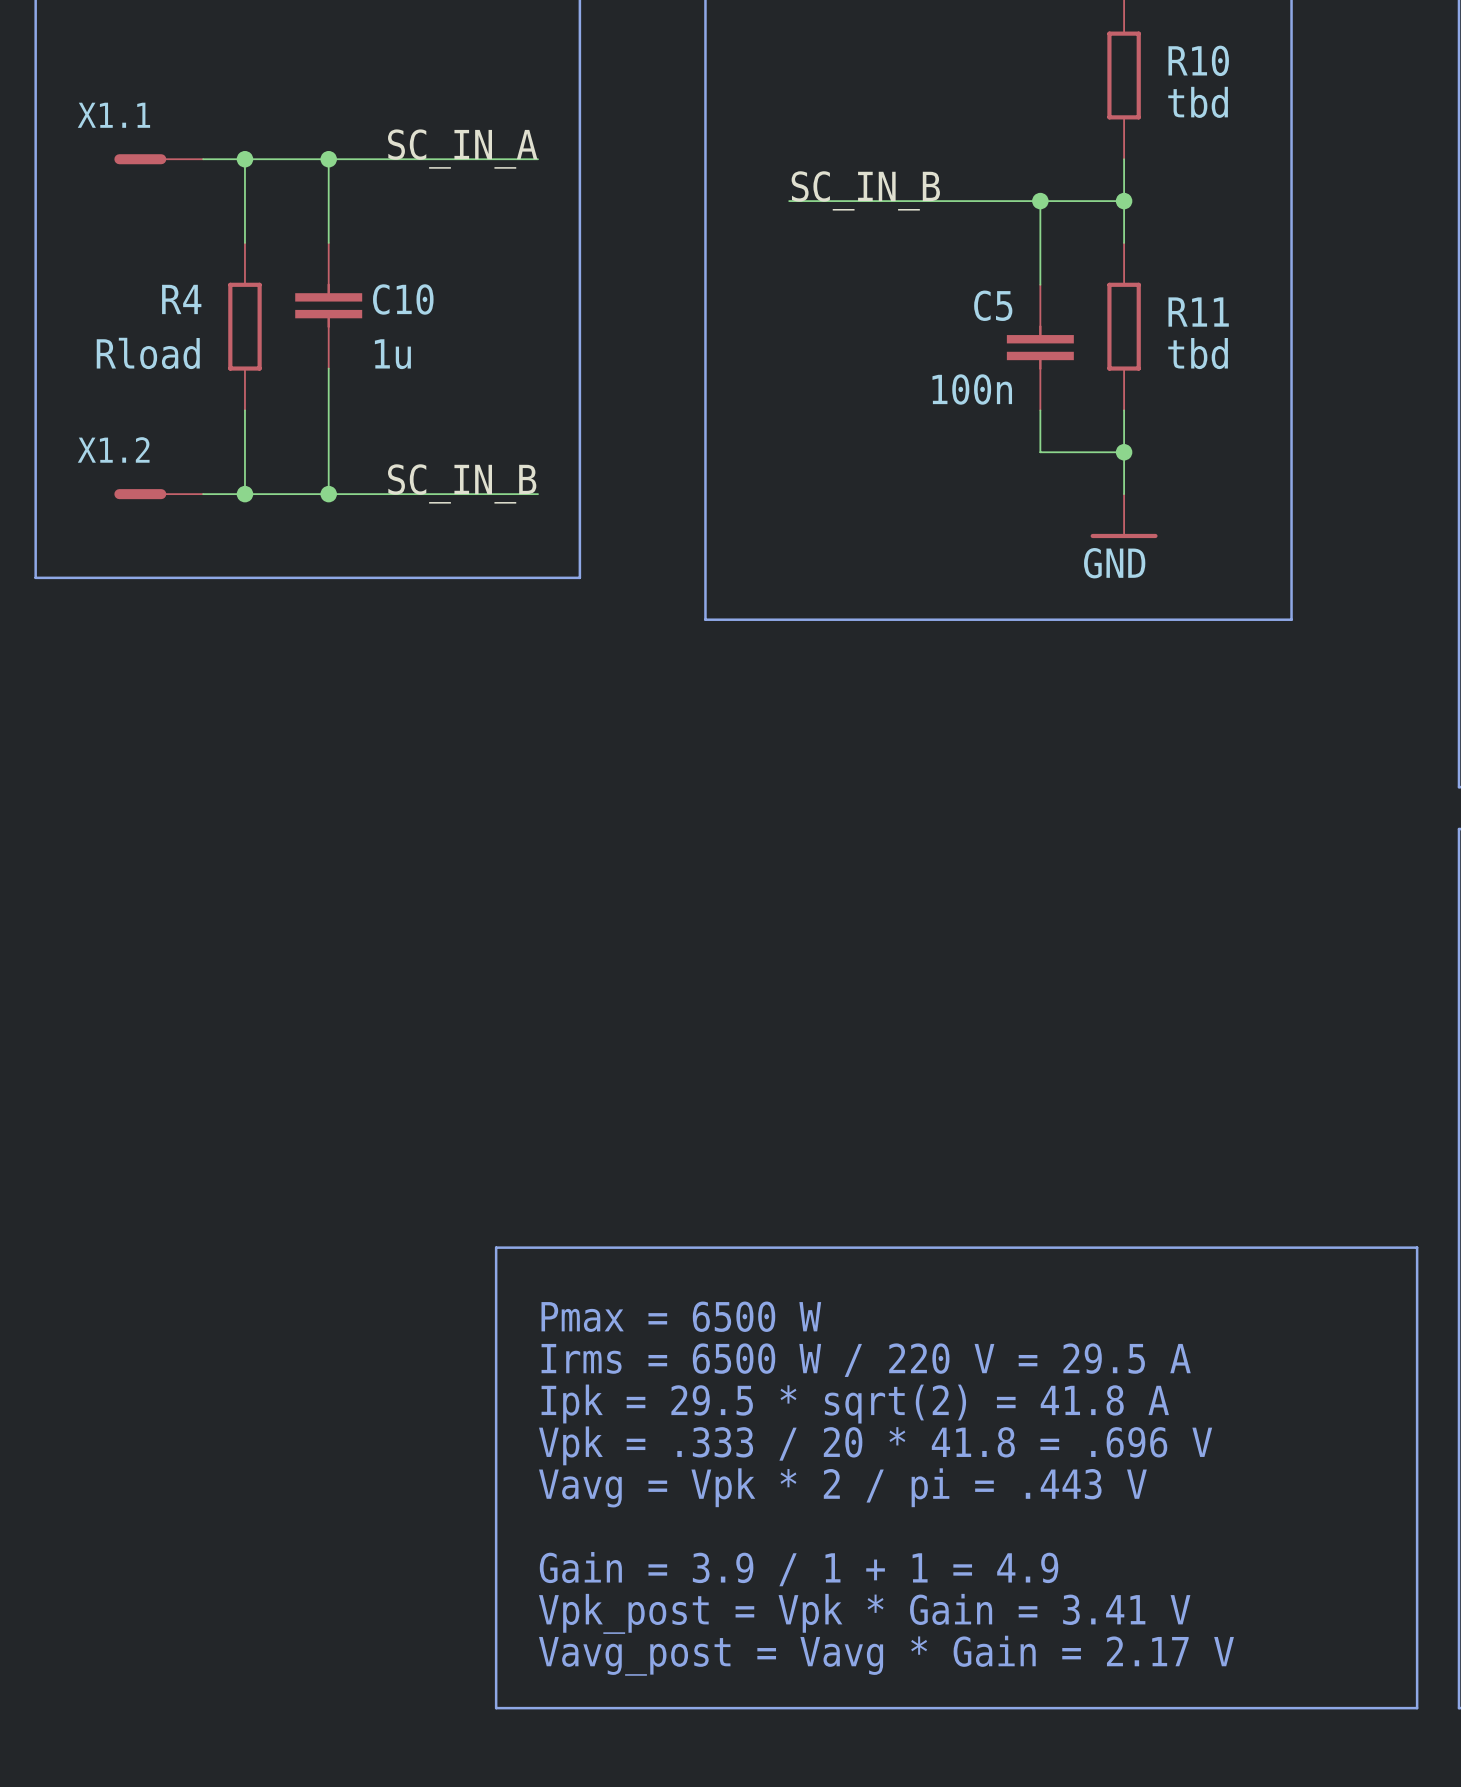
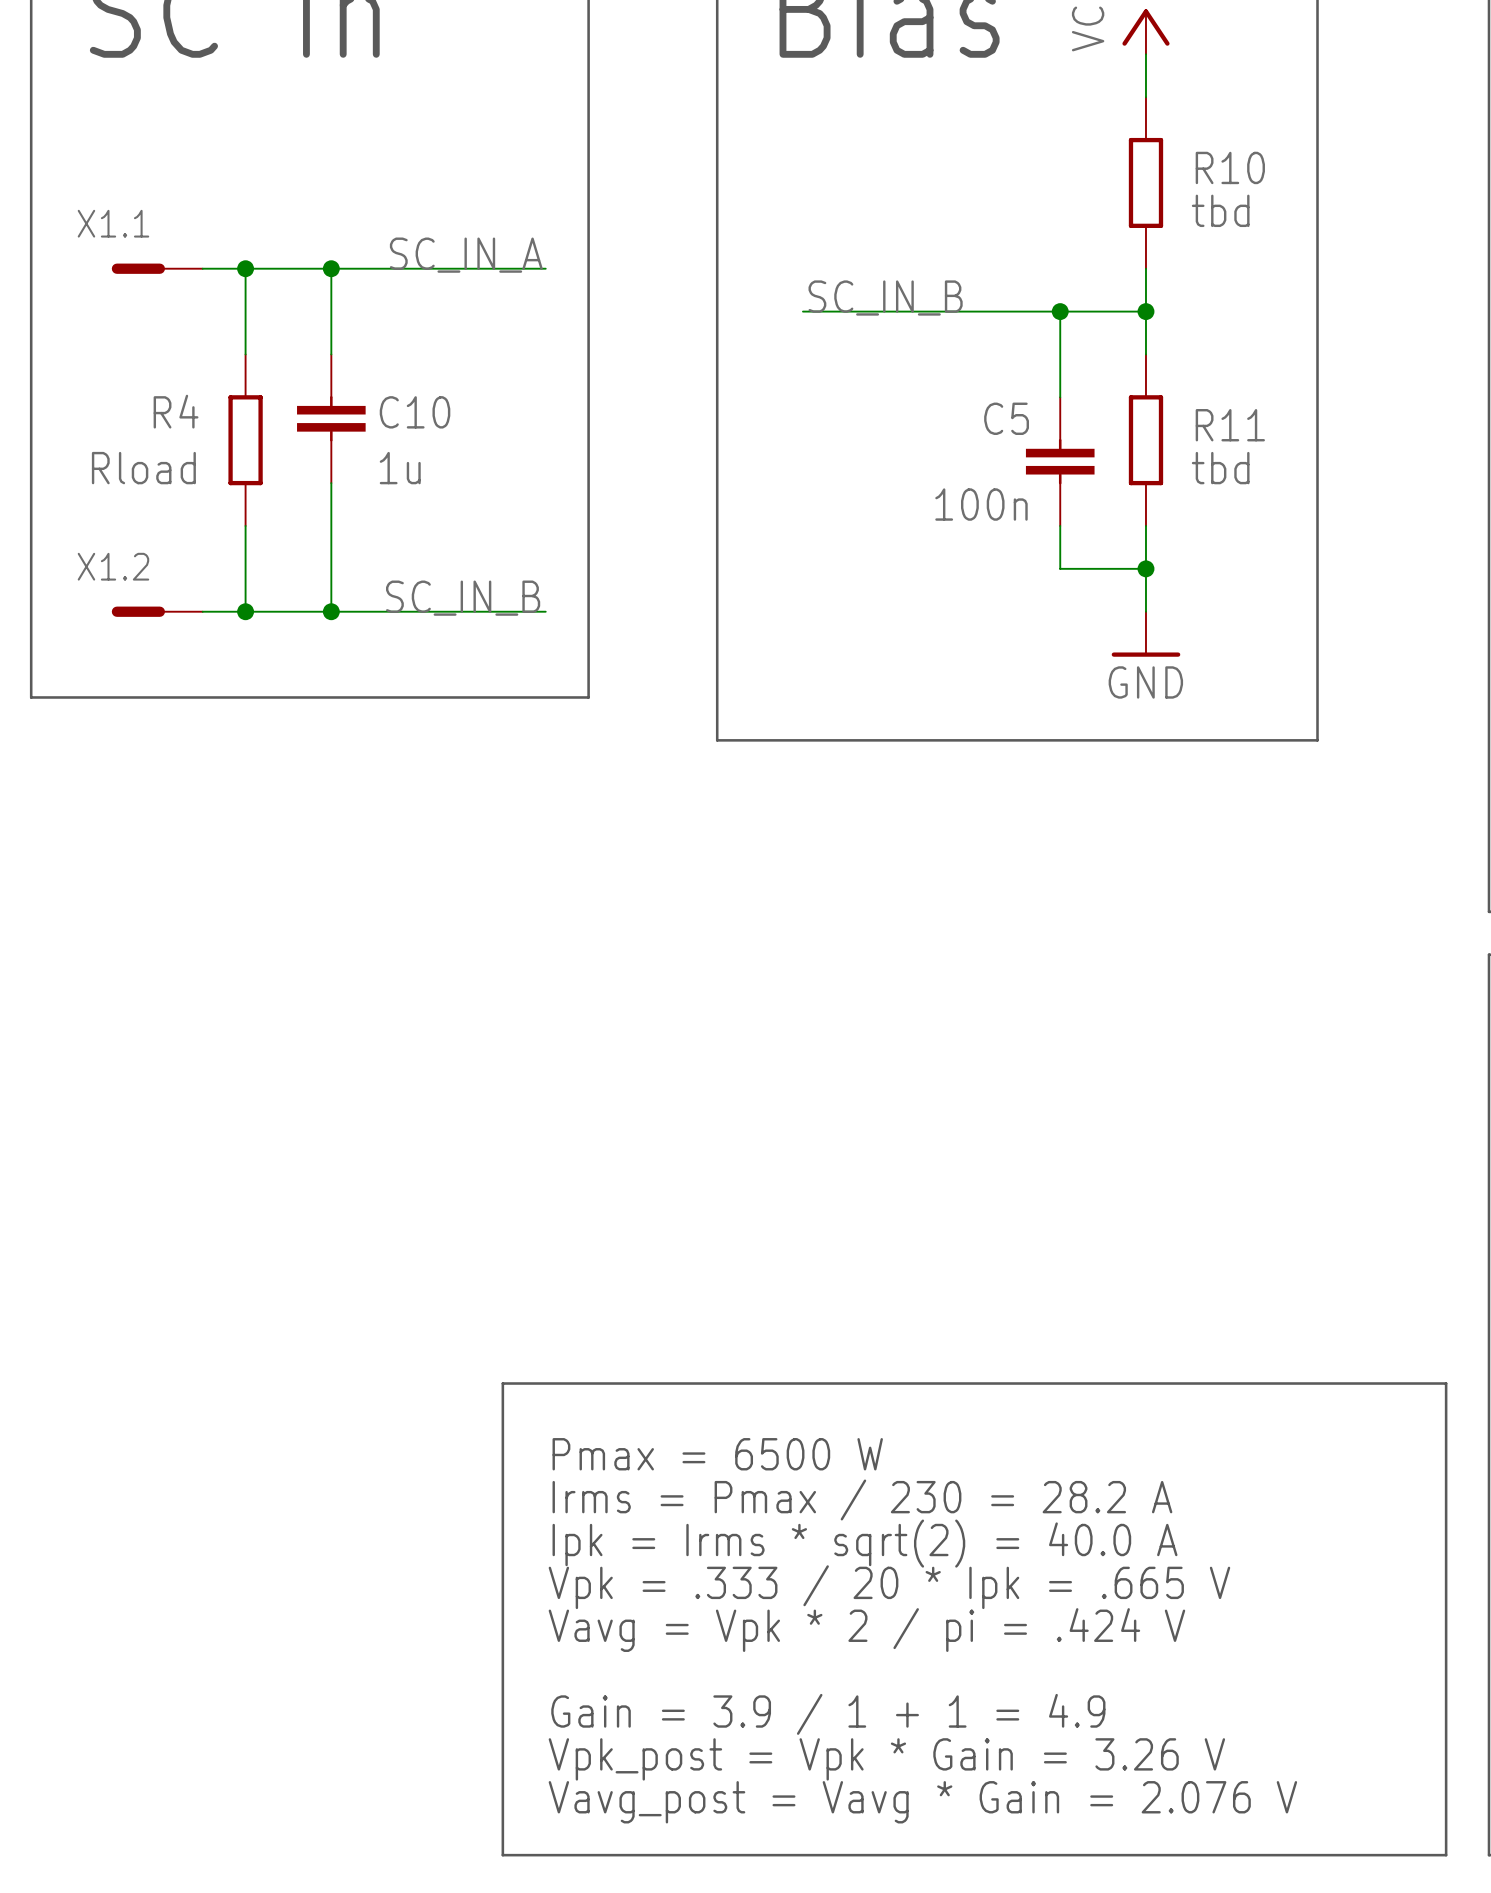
text: Irms = 6500 W / 220 V = 29.5 A (866, 1360) -> Irms = Pmax / 230 = 28.2 A (862, 1499)
text: Ipk = 29.5 * sqrt(2) = 41.8 A (855, 1404) -> Ipk = Irms * sqrt(2) = 40.0 A (865, 1543)
text: Vpk = .333 / 20 * 41.8 = .696 V (875, 1445) -> Vpk = .333 / 20 * Ipk = .665 V (889, 1587)
text: Vavg = Vpk * 2 / pi = .443 V (842, 1487) -> Vavg = Vpk * 2 / pi = .424 V (866, 1630)
text: Vpk_post = Vpk * Gain = 3.41 V (864, 1613) -> Vpk_post = Vpk * Gain = 3.26 V (886, 1759)
text: Vavg_post = Vavg * Gain = 2.17 V (886, 1655) -> Vavg_post = Vavg * Gain = 2.076 V (922, 1802)

